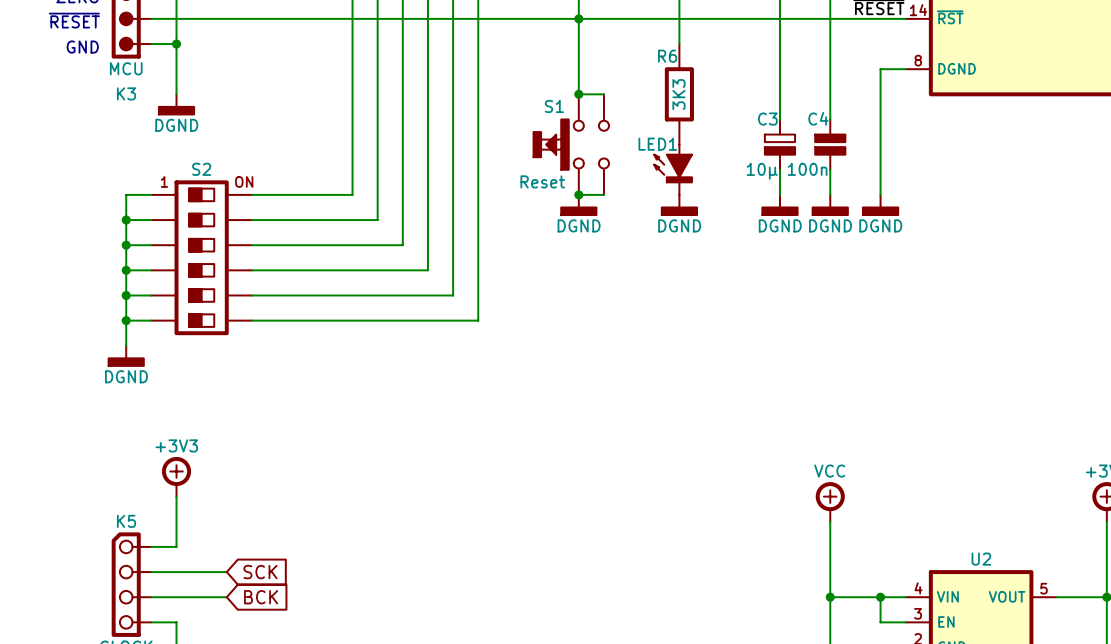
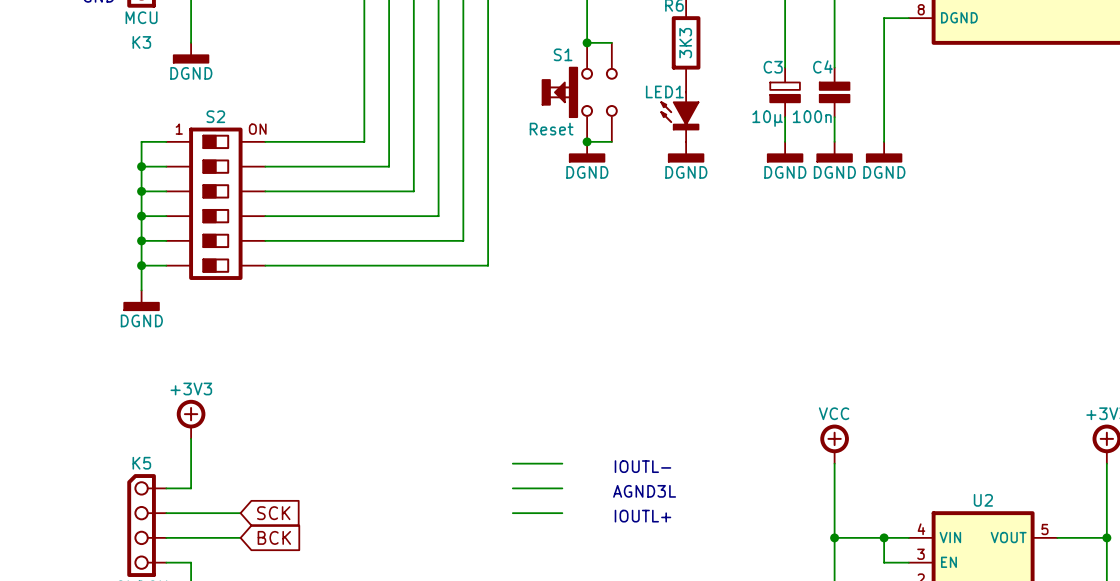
wire: none -> (512, 463) (562, 463)
text: none -> IOUTL- (642, 466)
wire: none -> (512, 488) (562, 488)
text: none -> AGND3L (644, 491)
wire: none -> (512, 513) (562, 513)
text: none -> IOUTL+ (642, 516)

